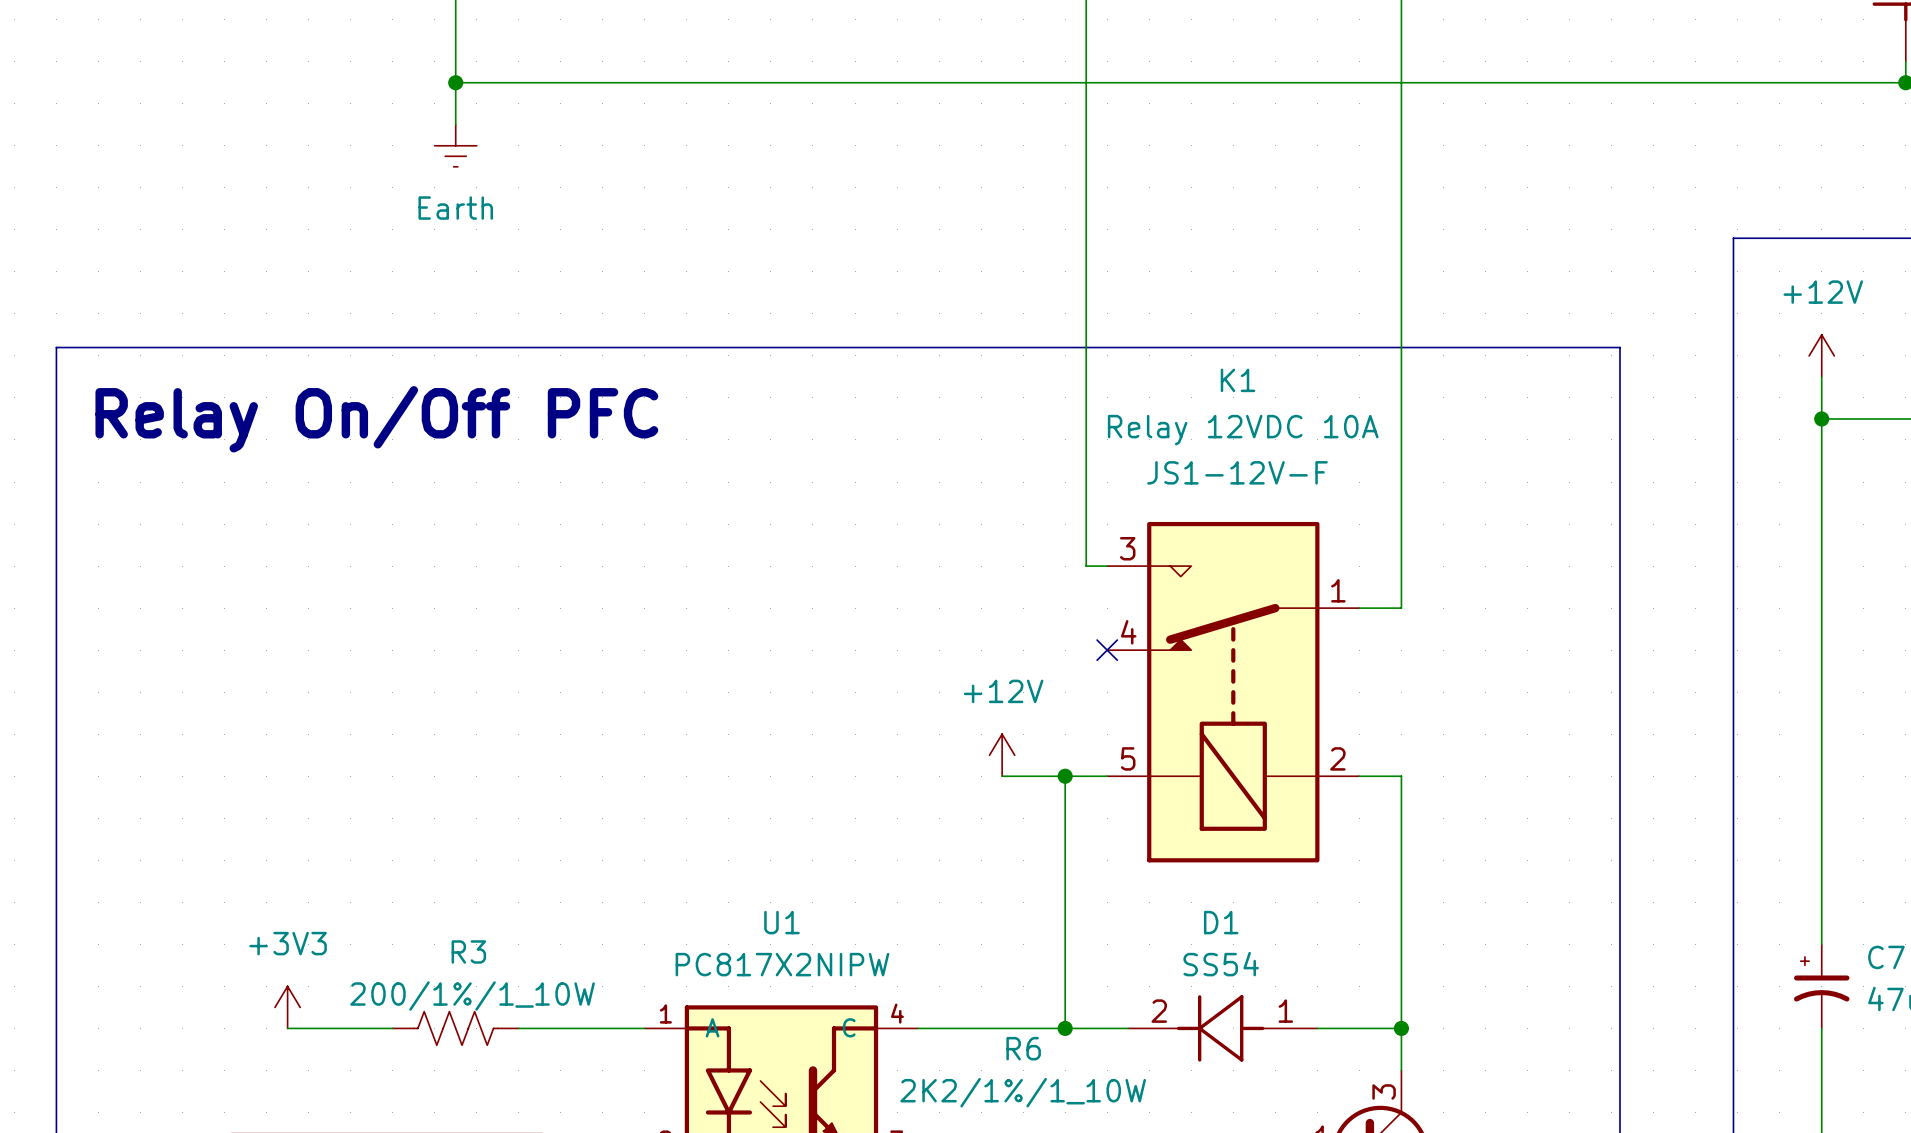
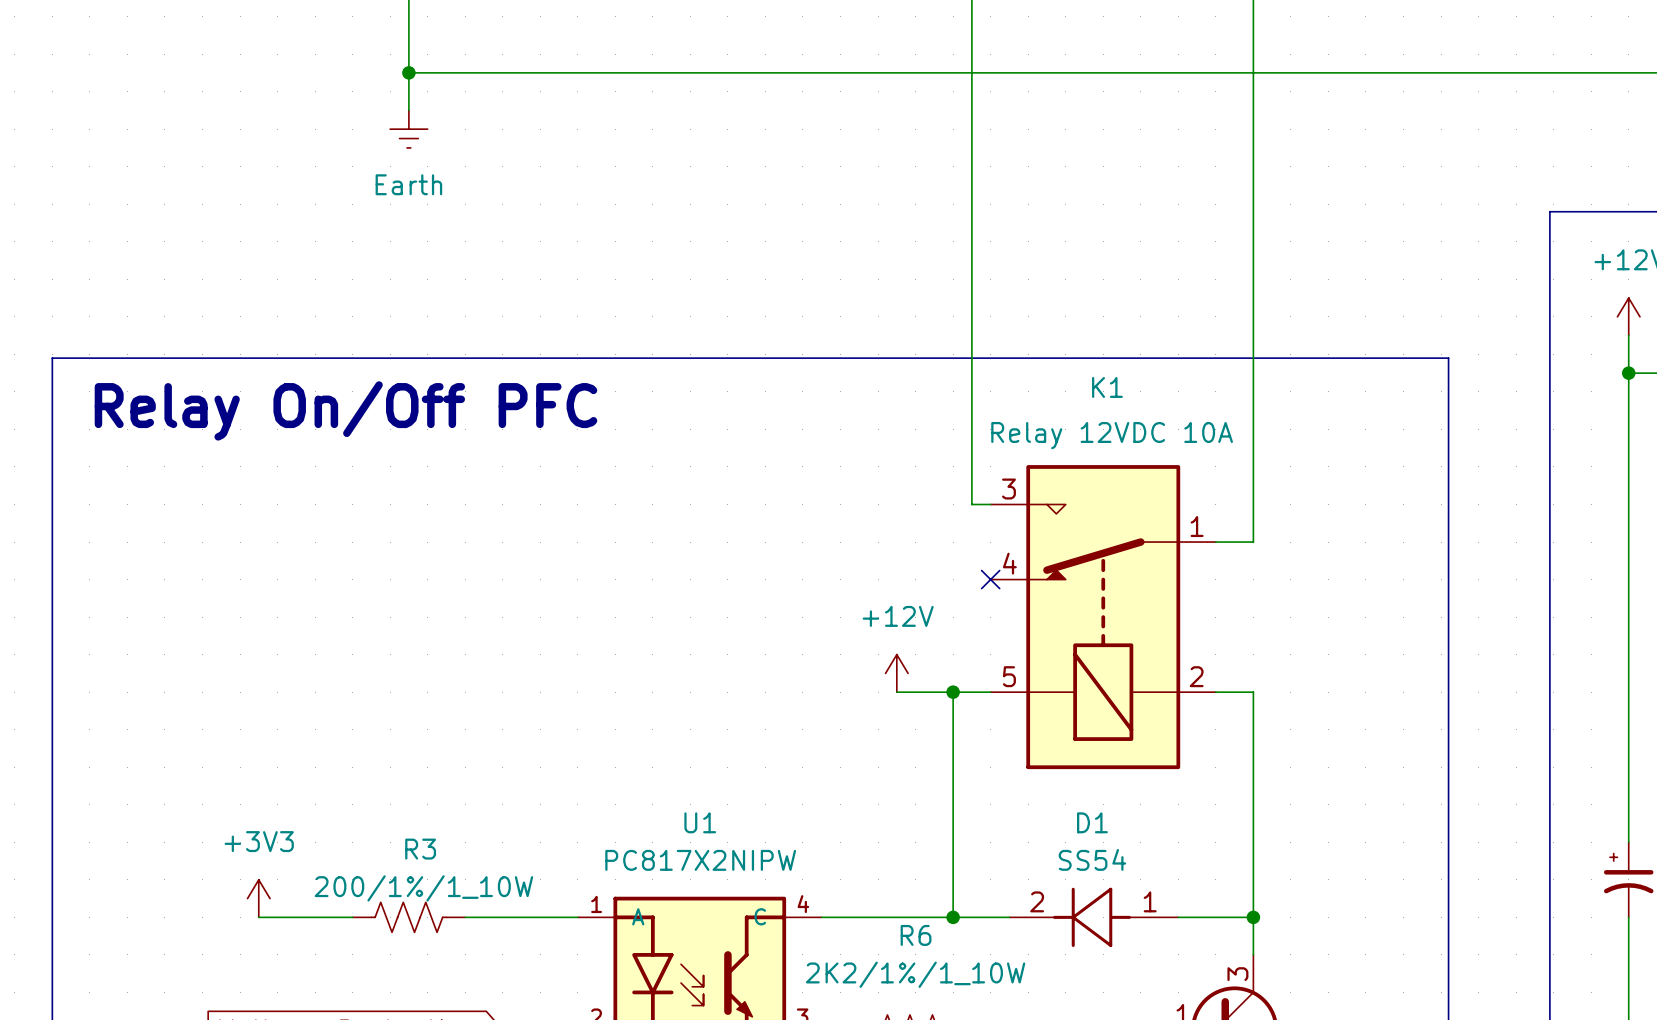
K1 name position: K1 (1238, 380) -> K1 (1107, 387)
line: (56, 402) (56, 347) (1619, 347) (1619, 402) -> (52, 358) (1448, 358)
text position: Relay On/Off PFC (376, 419) -> Relay On/Off PFC (345, 410)
K1 value position: Relay 12VDC 10A (1243, 430) -> Relay 12VDC 10A (1112, 435)
K1 text: JS1-12V-F (1237, 472) -> none

